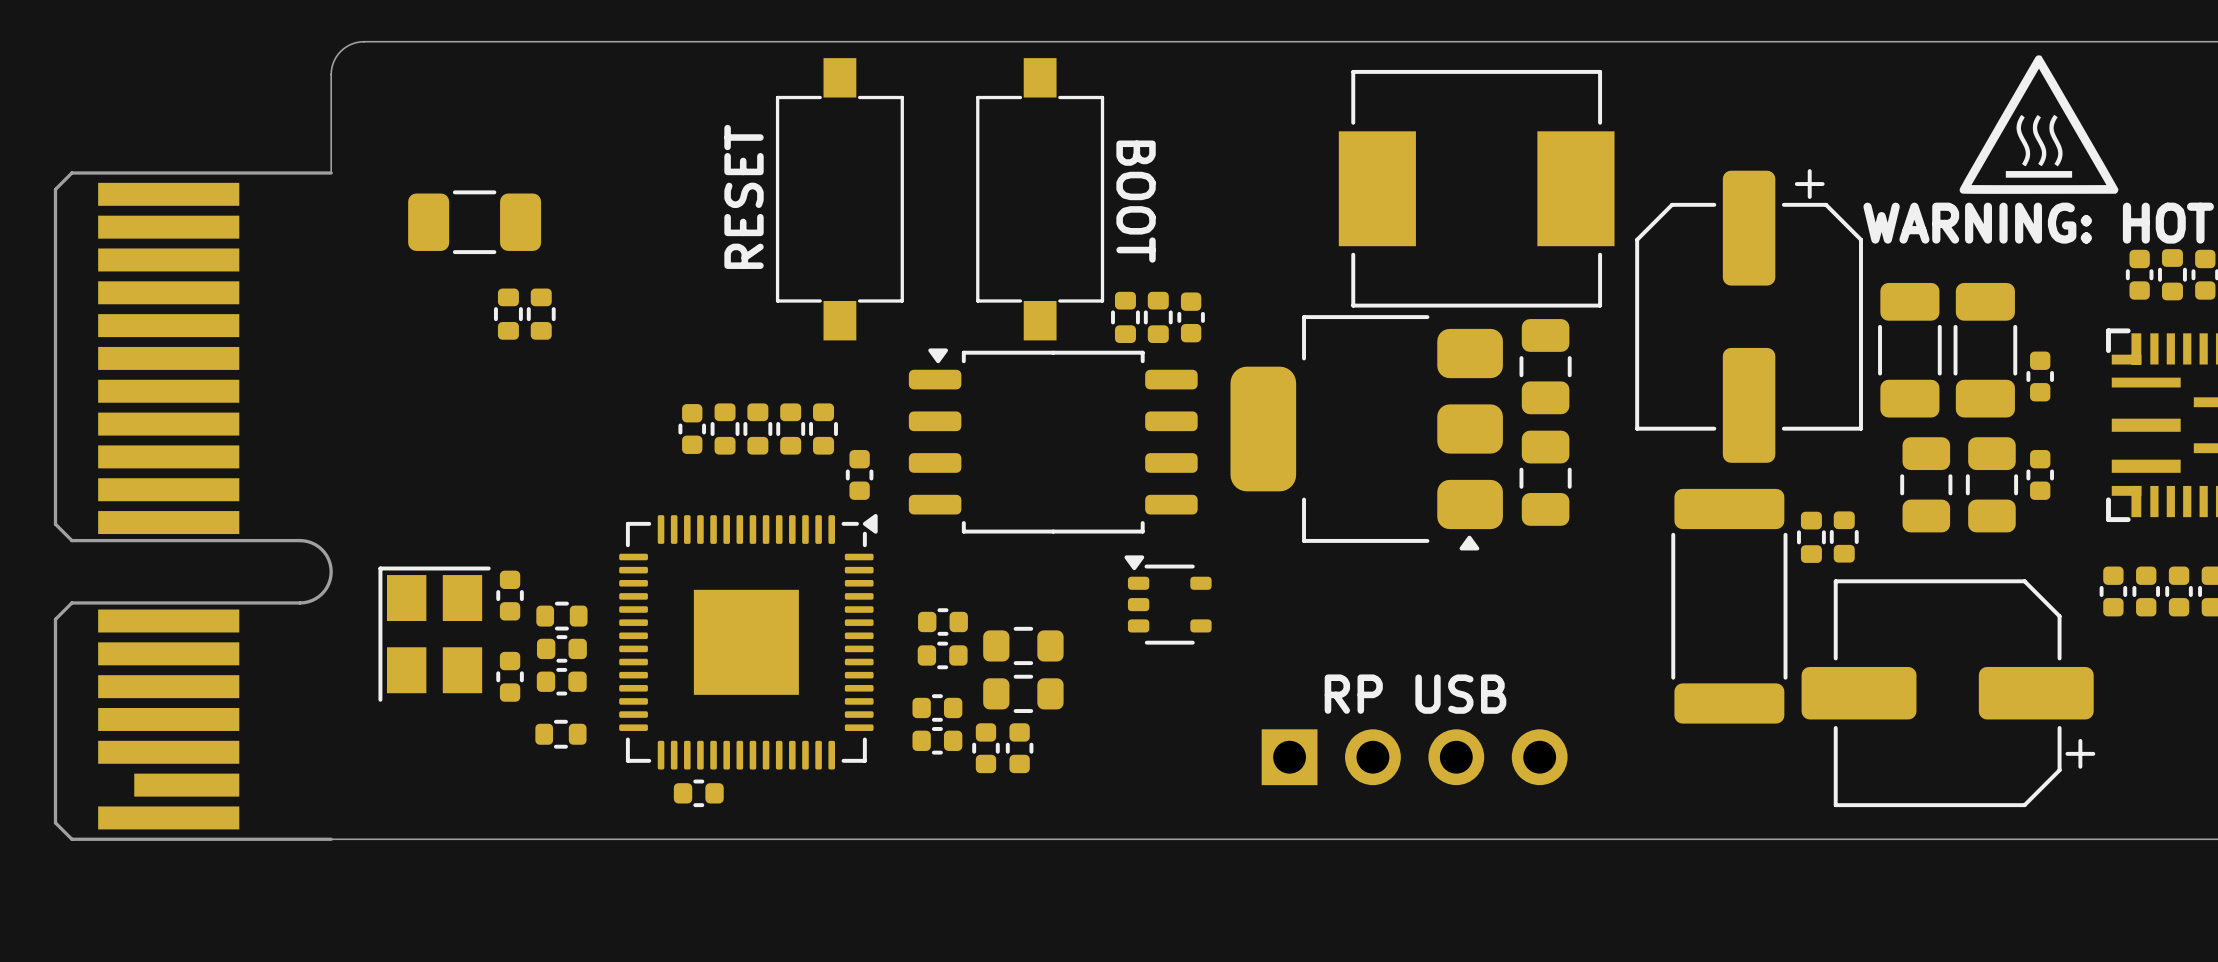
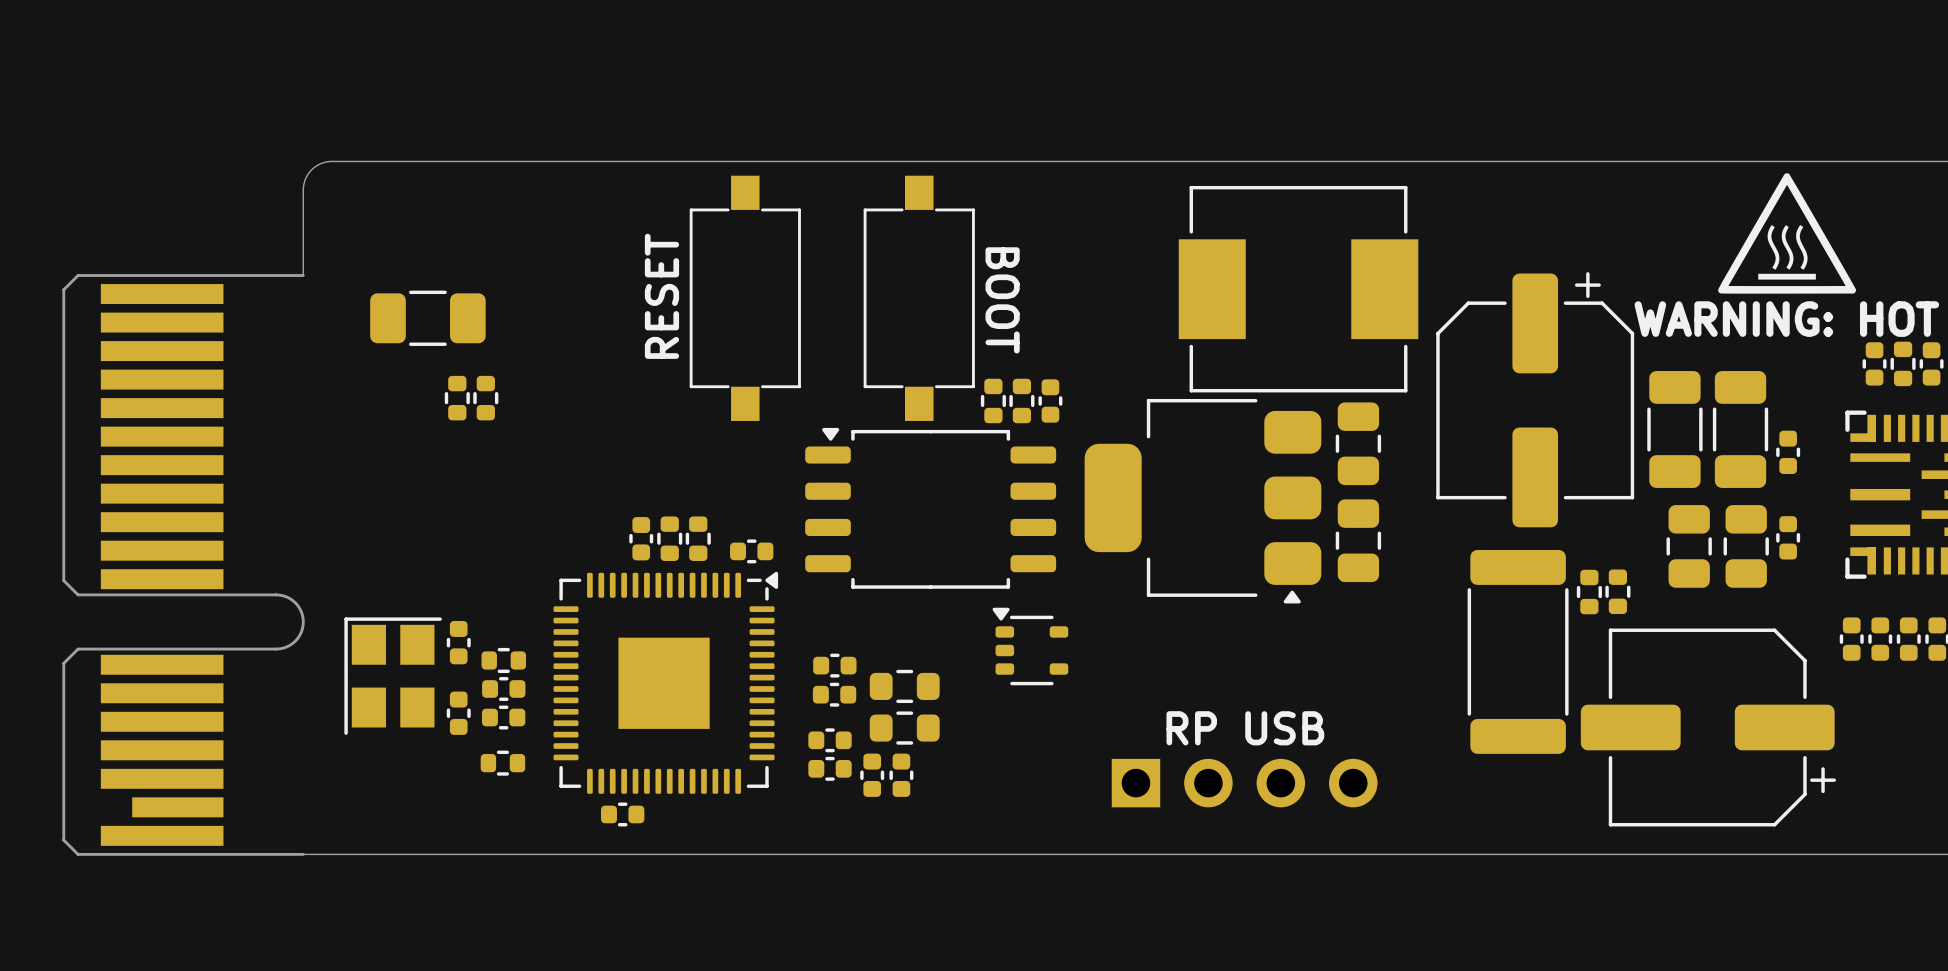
part position: (692, 429) -> (641, 538)
part: (725, 429) -> none
part: (757, 429) -> none
part: (790, 429) -> none
part: (823, 429) -> none
part rotation: 0° (859, 474) -> 90° clockwise (751, 551)
part: none -> (669, 538)
part: none -> (698, 538)

